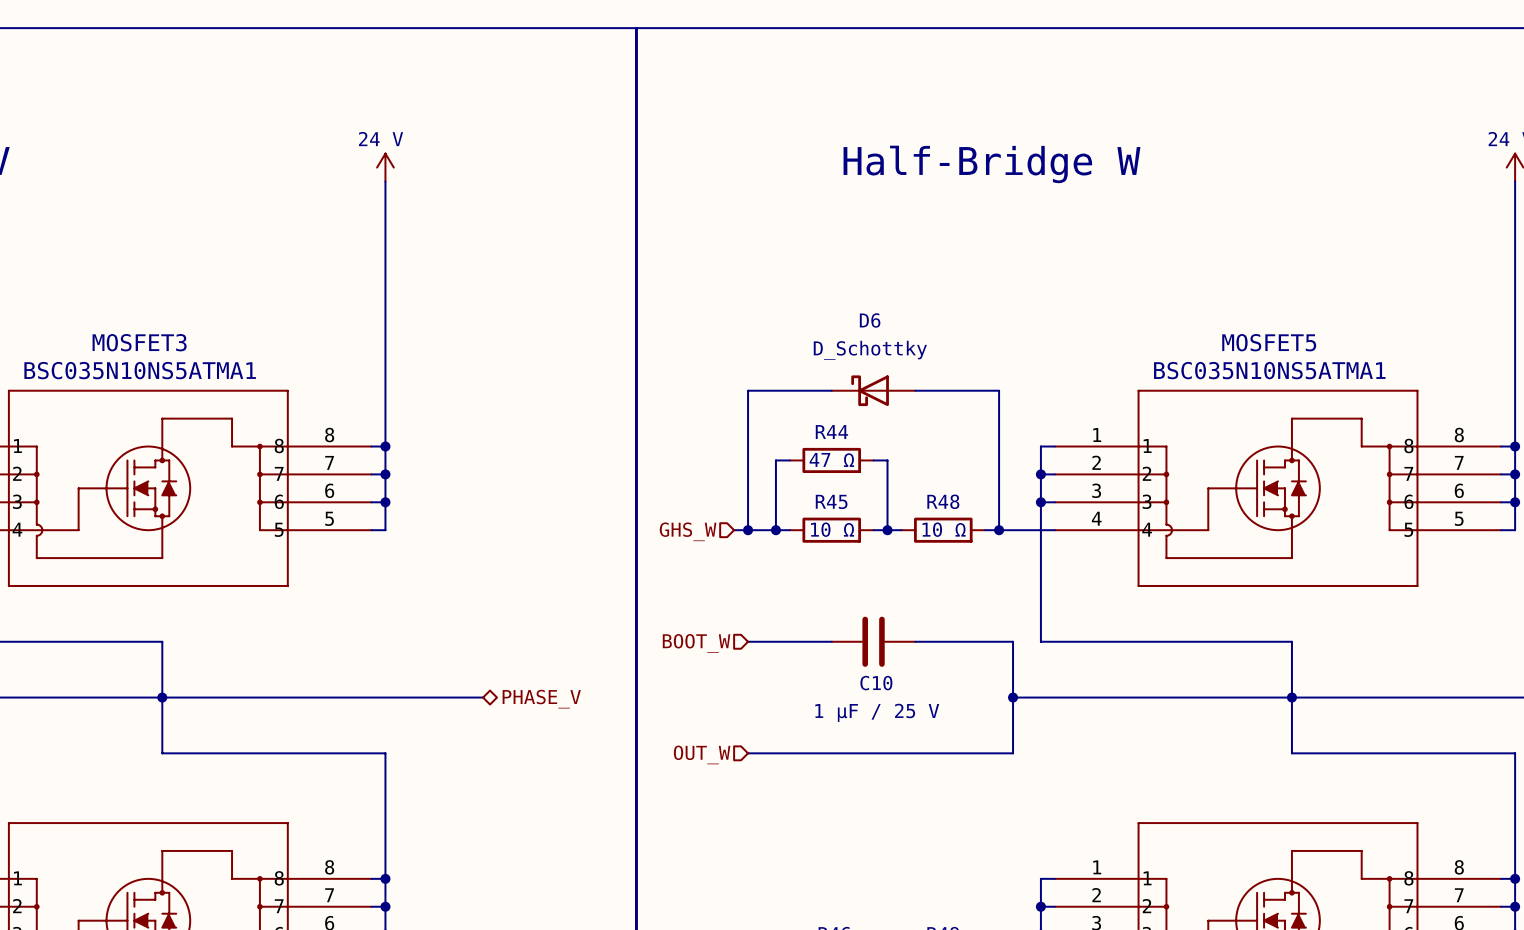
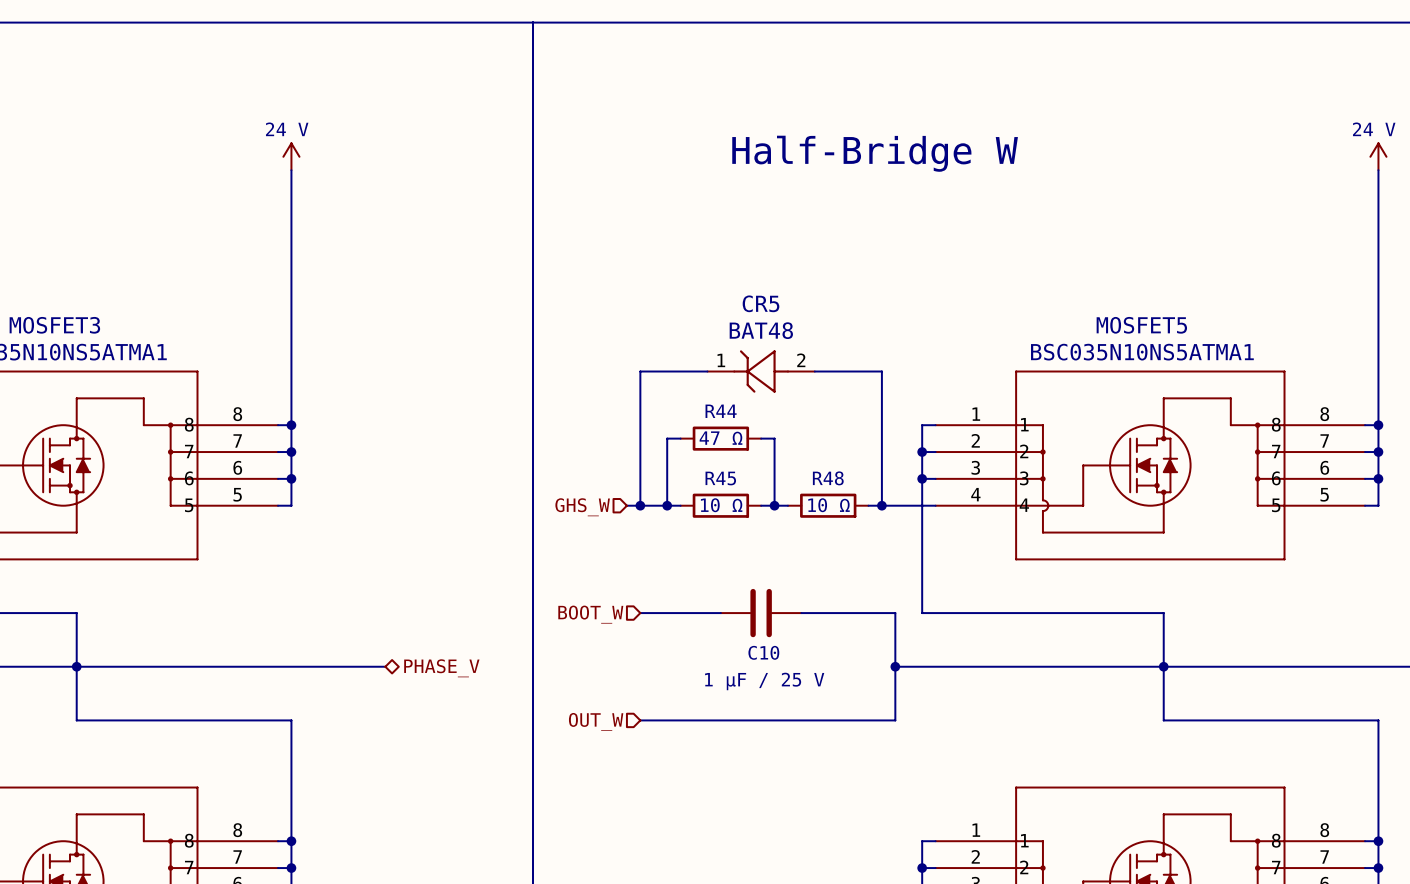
D6: D_Schottky (873, 390) -> none
CR5: none -> BAT48 (761, 371)

